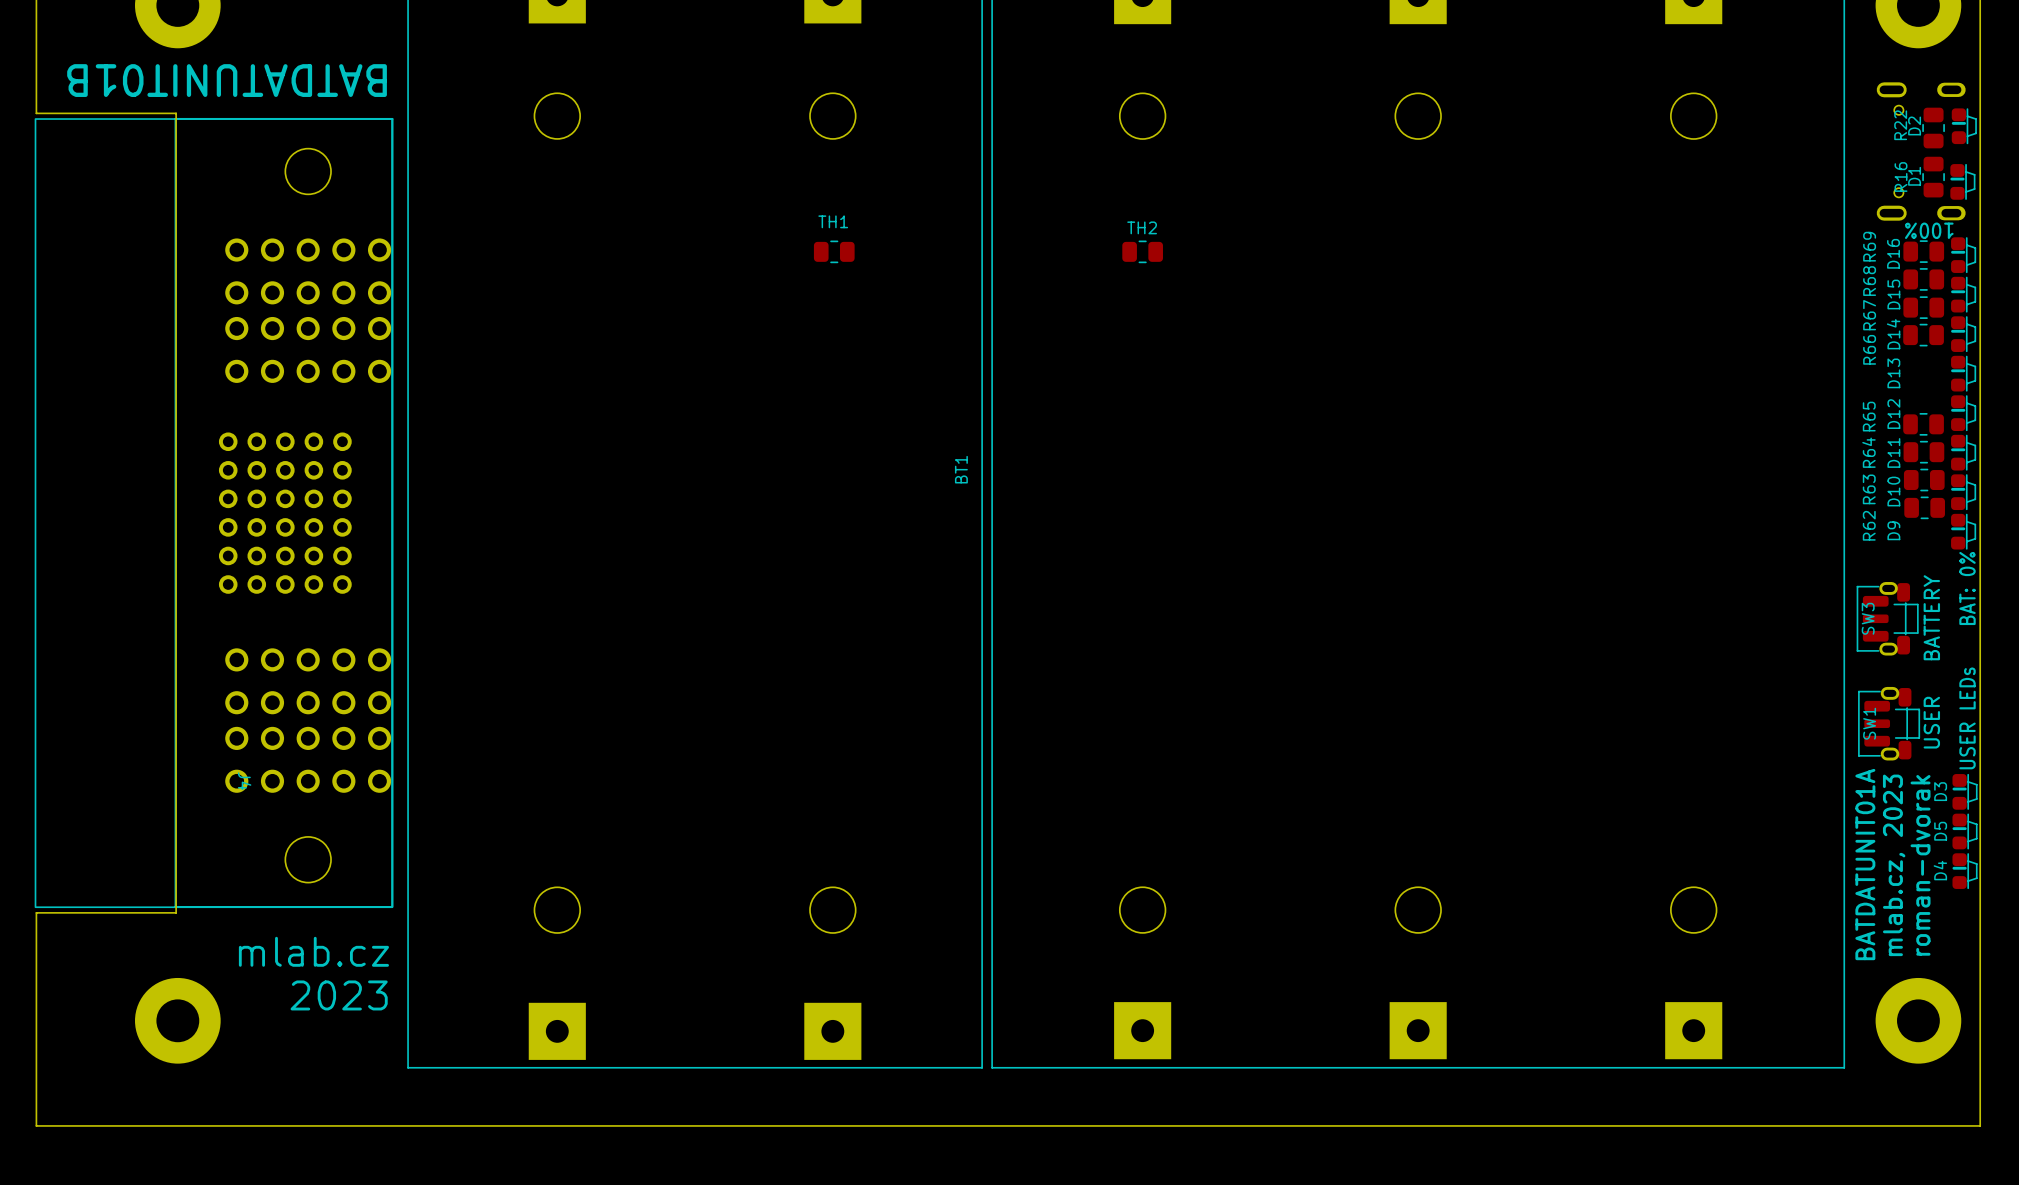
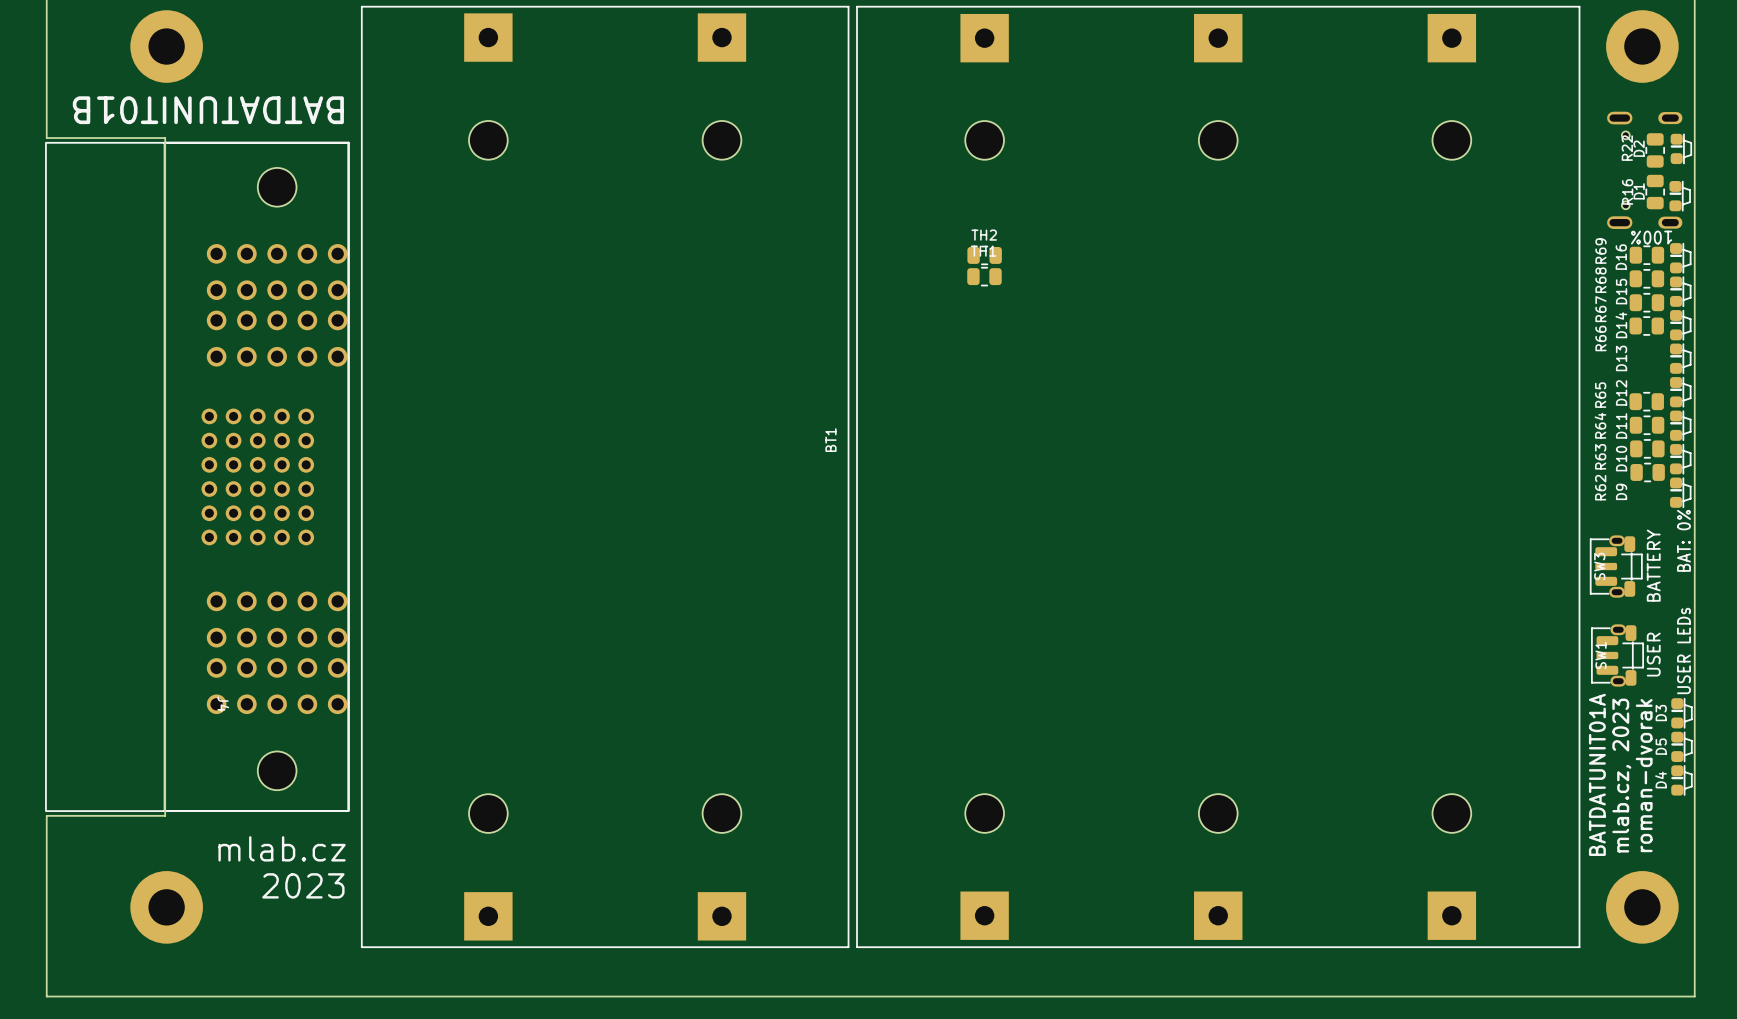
TH1 position: (834, 251) -> (984, 276)

